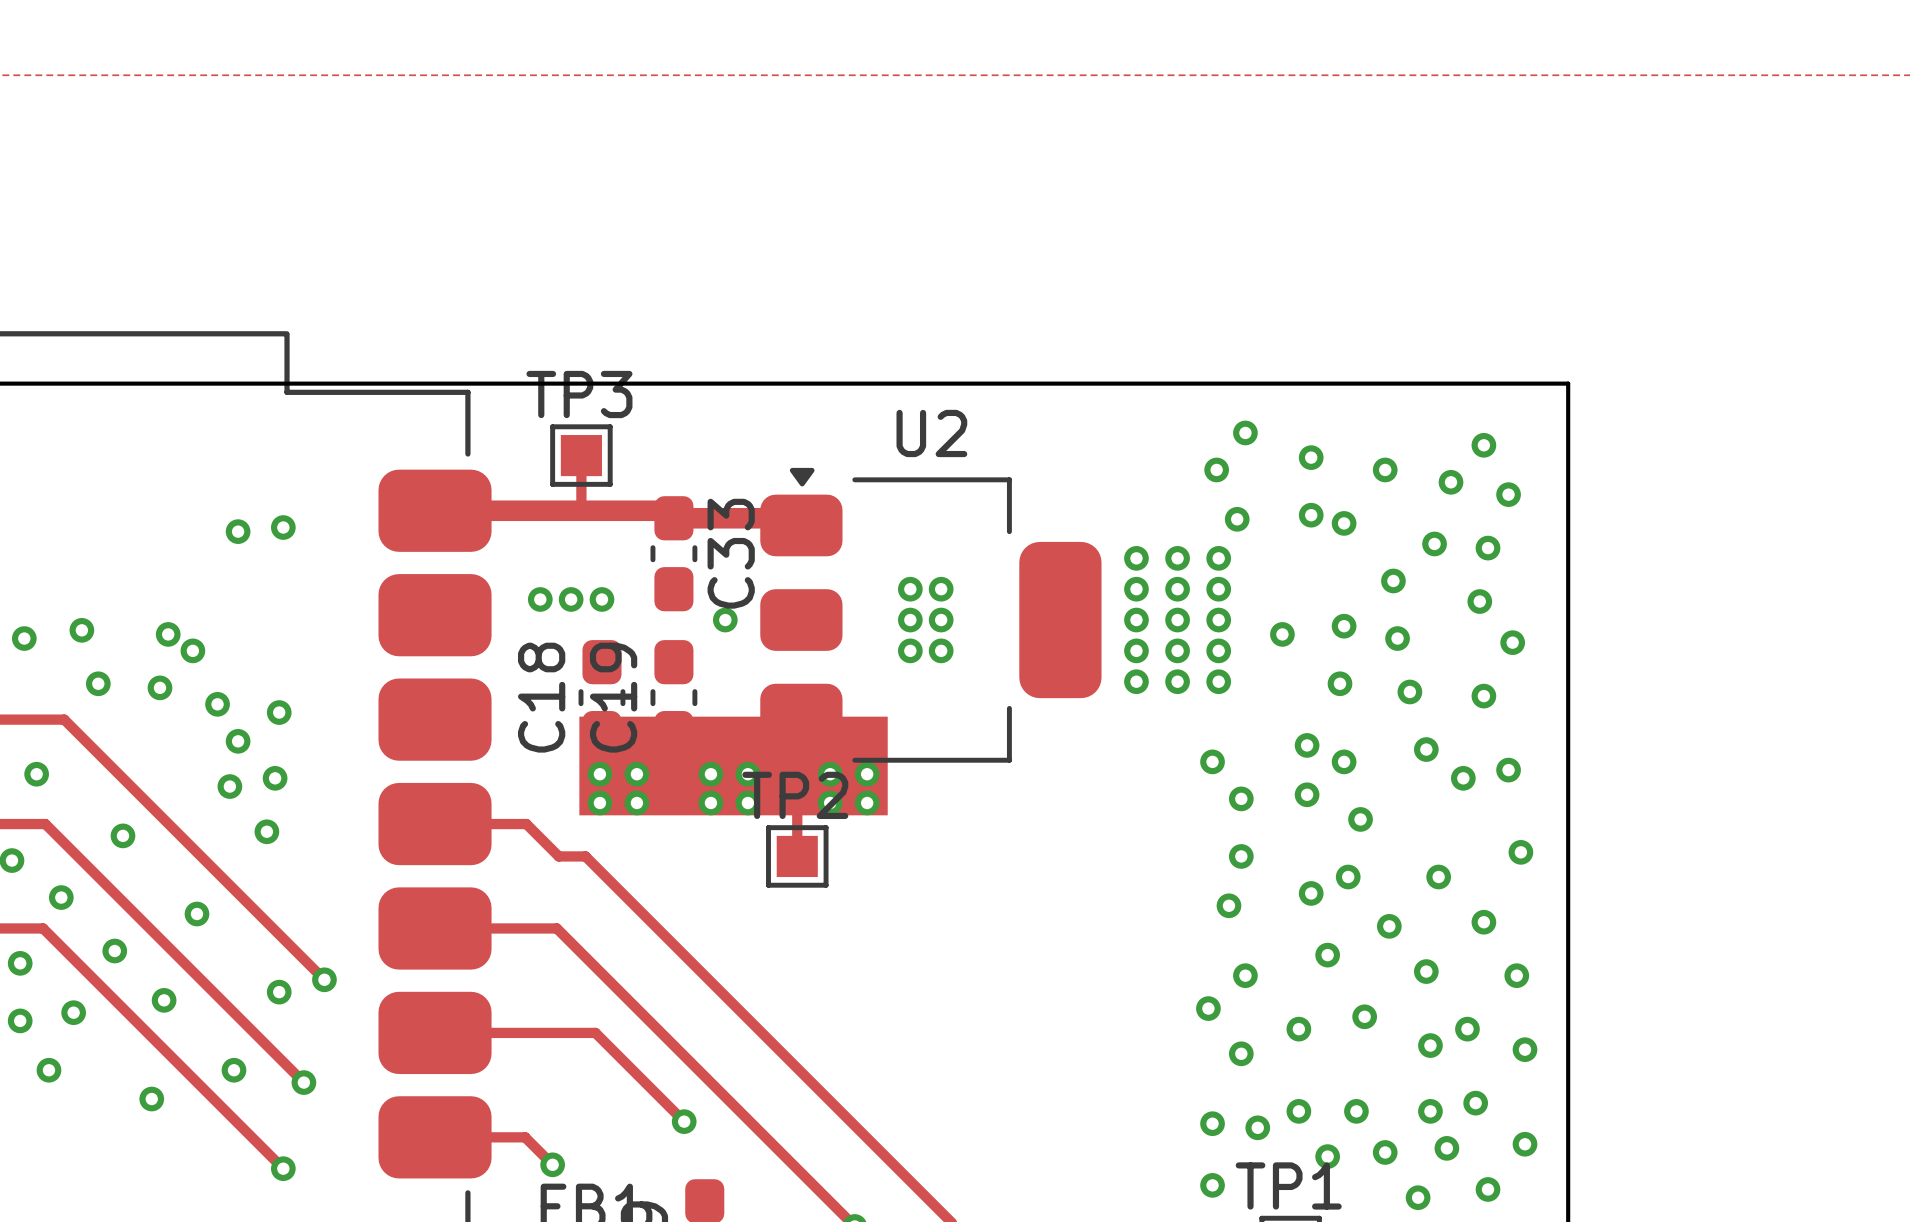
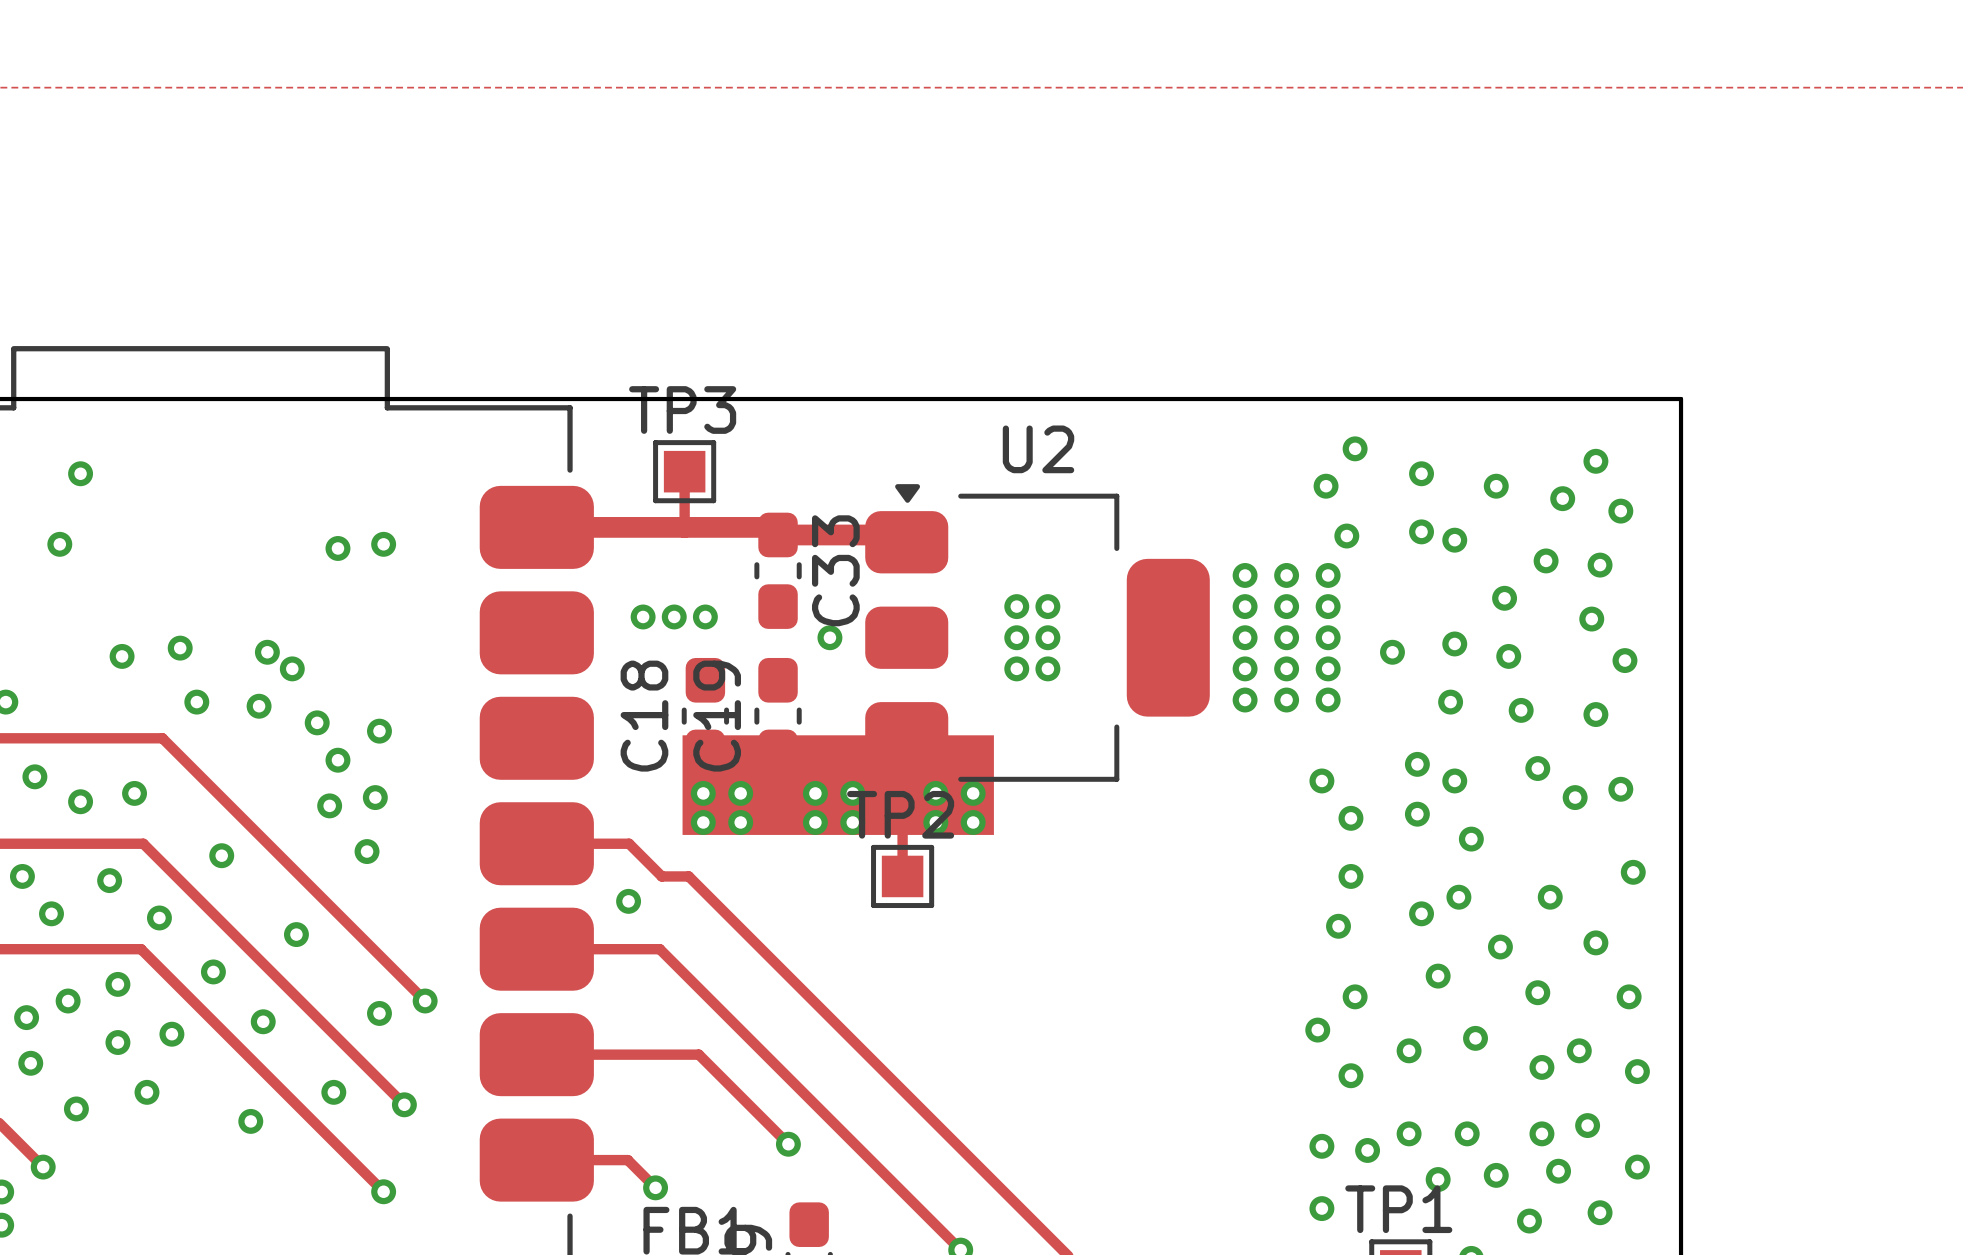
via: none -> (628, 901)

